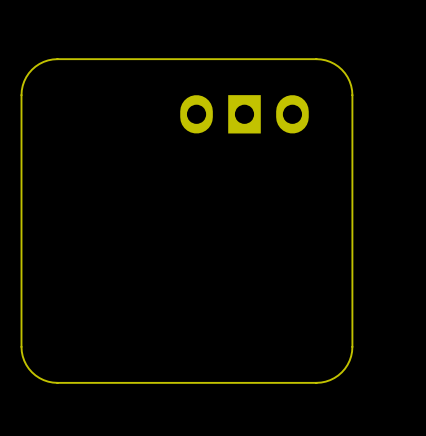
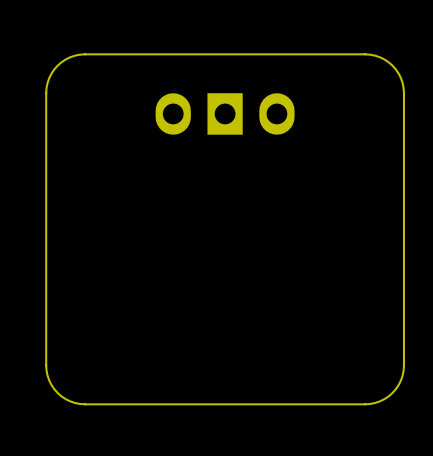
part position: (244, 114) -> (225, 113)

